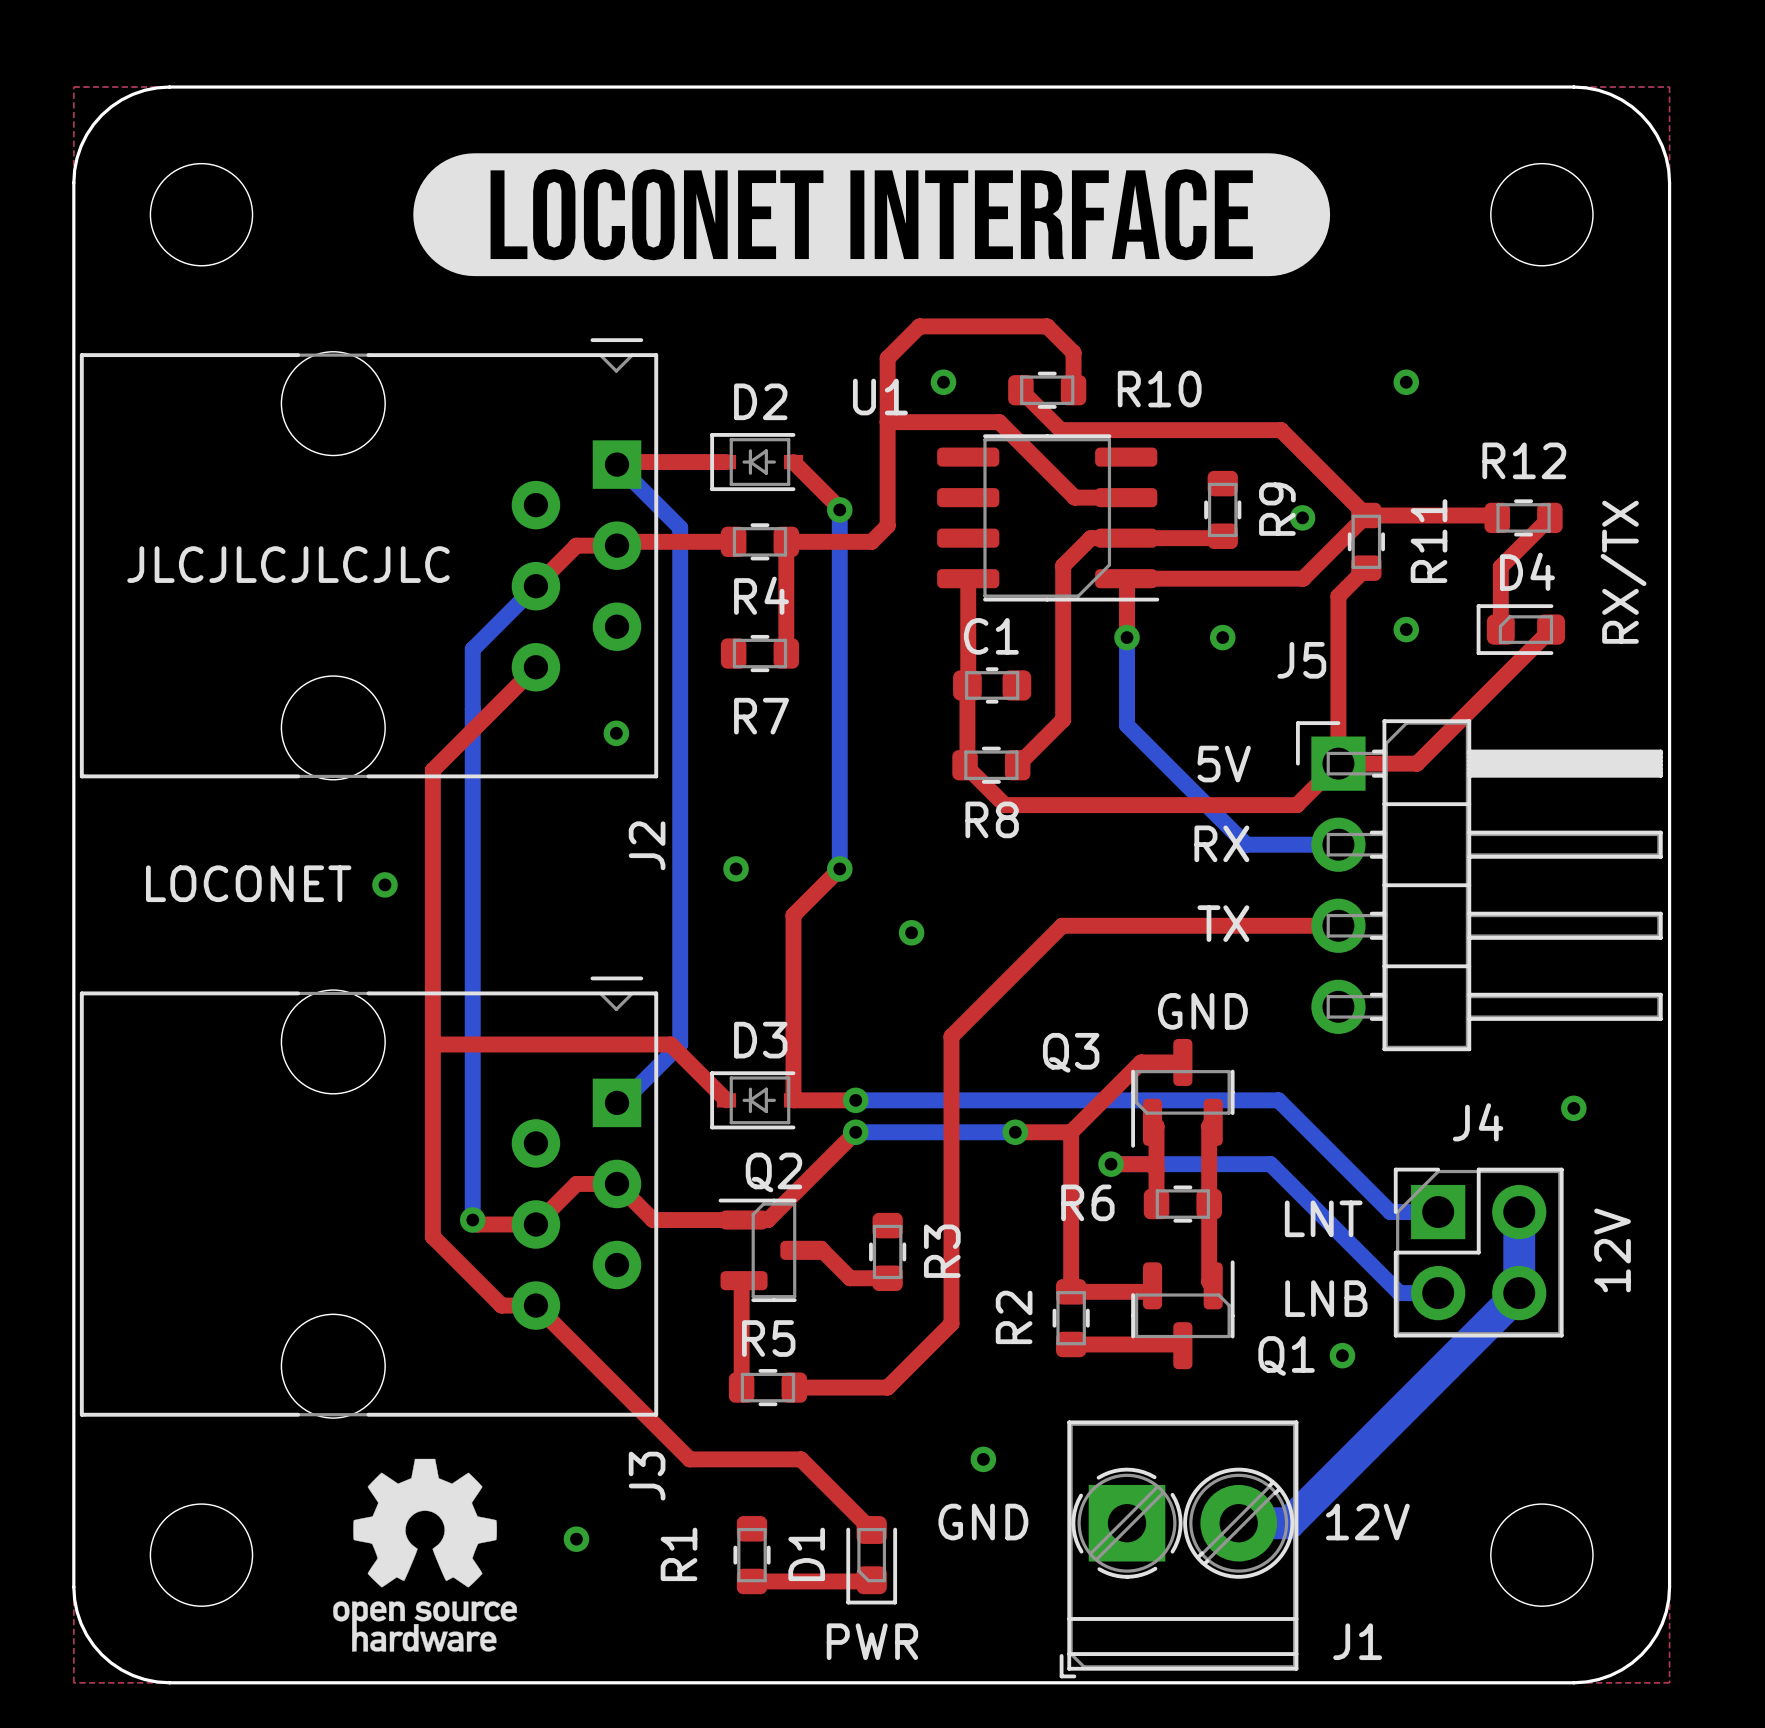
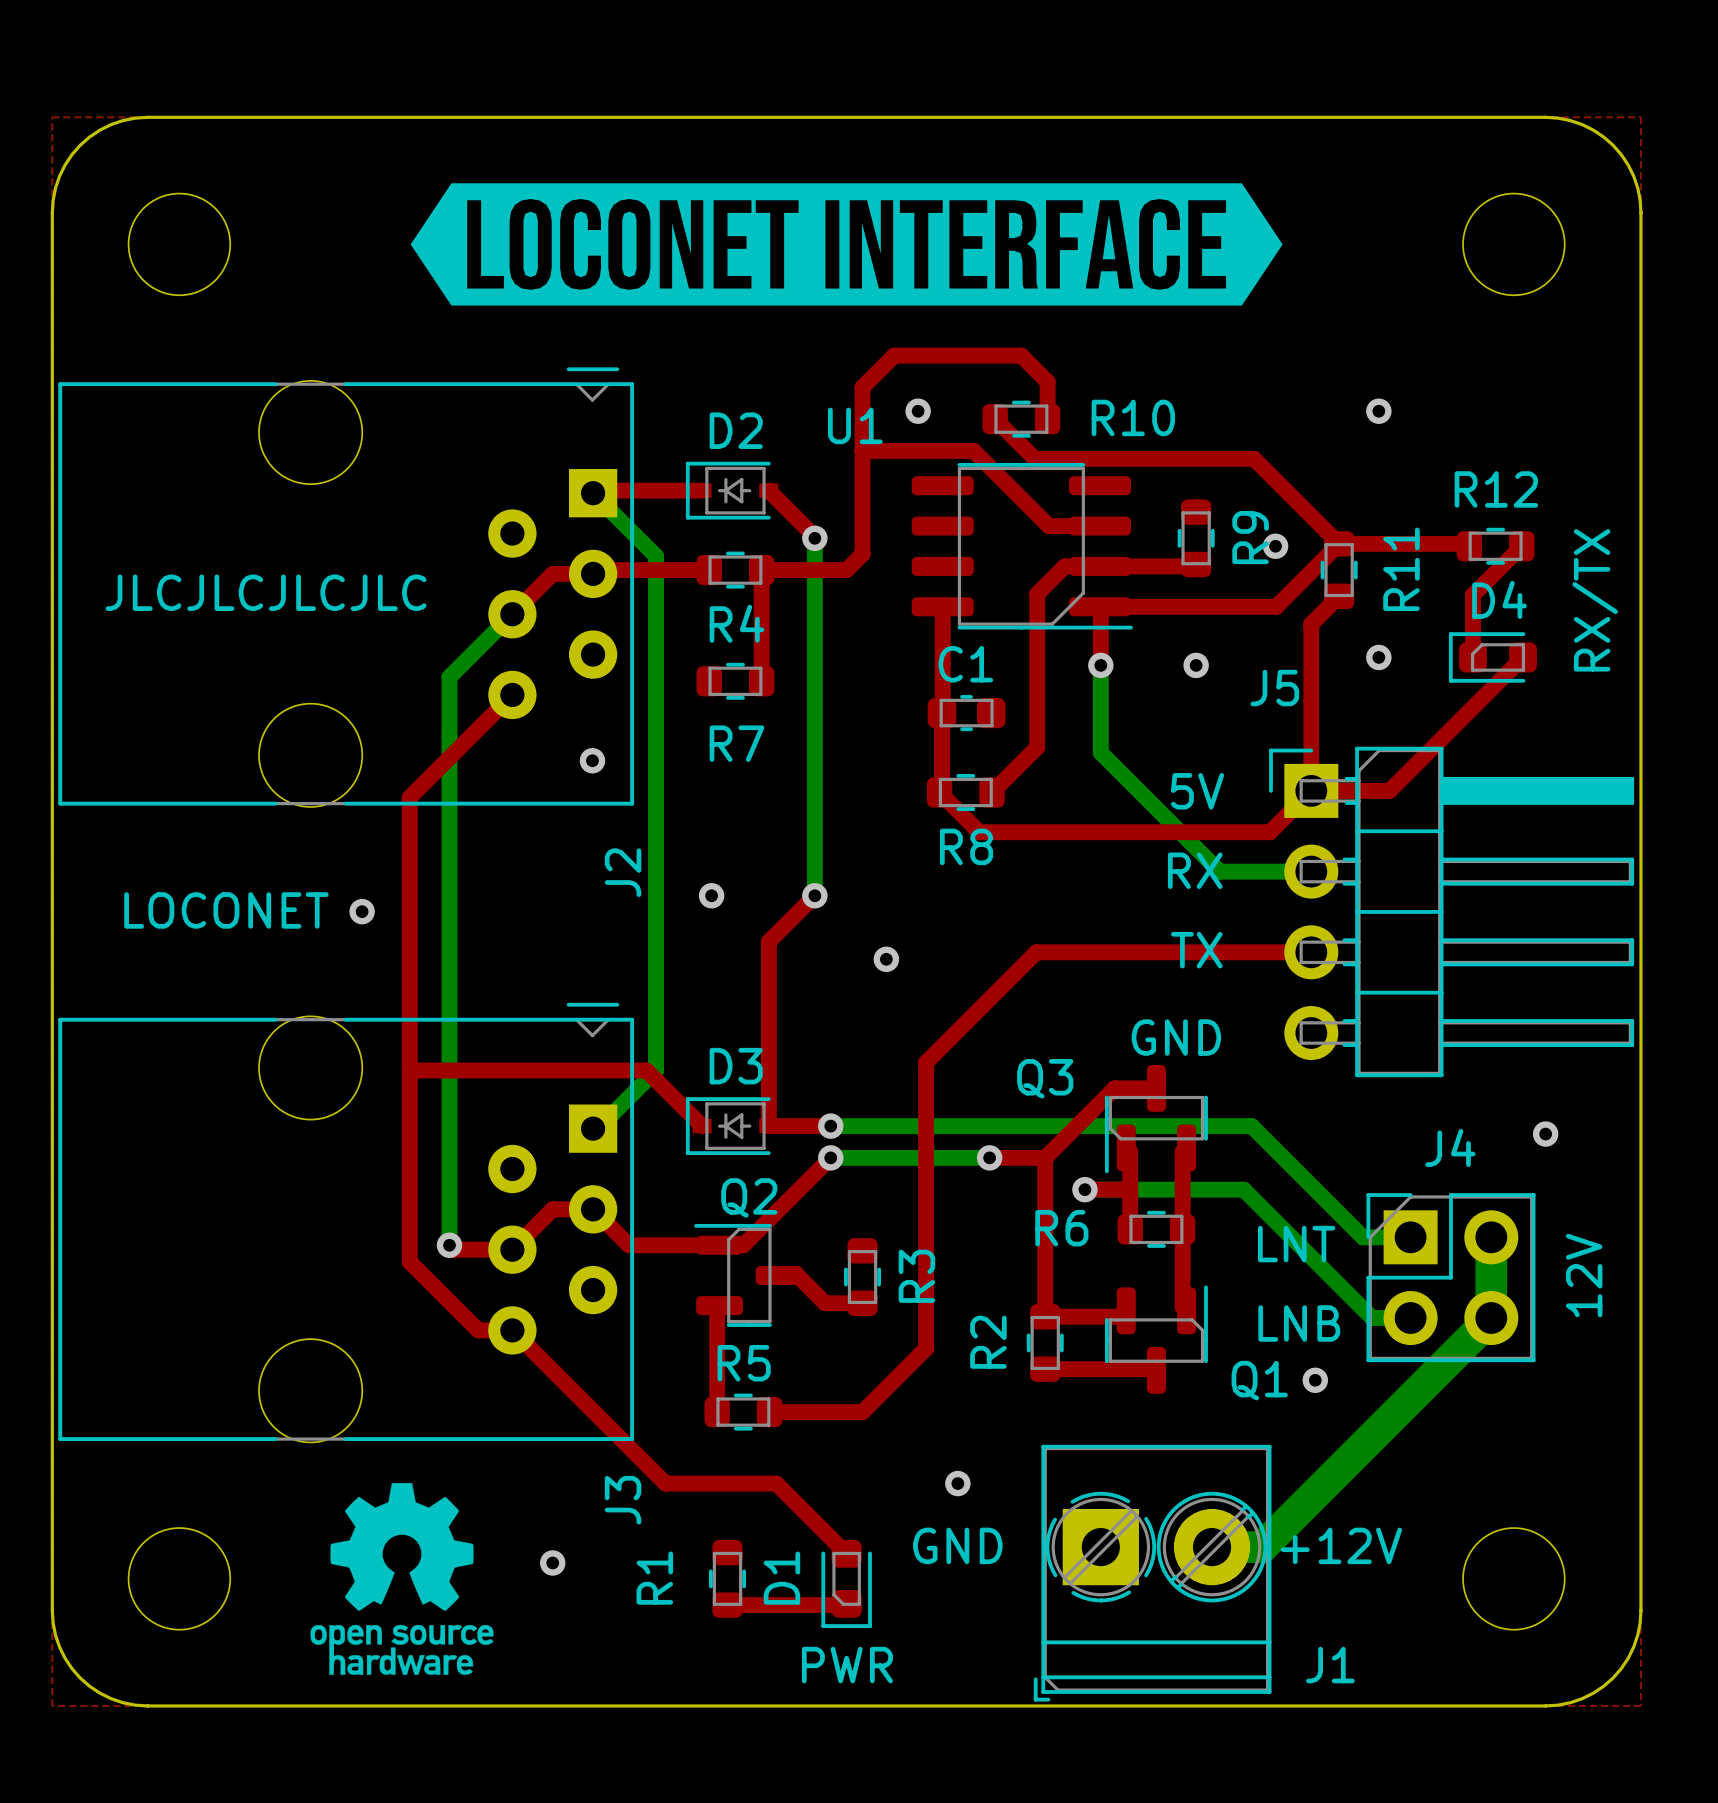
drawing shape: [413, 153, 1331, 277] -> [410, 183, 1283, 306]
text: 12V (1367, 1522) -> +12V (1341, 1545)

